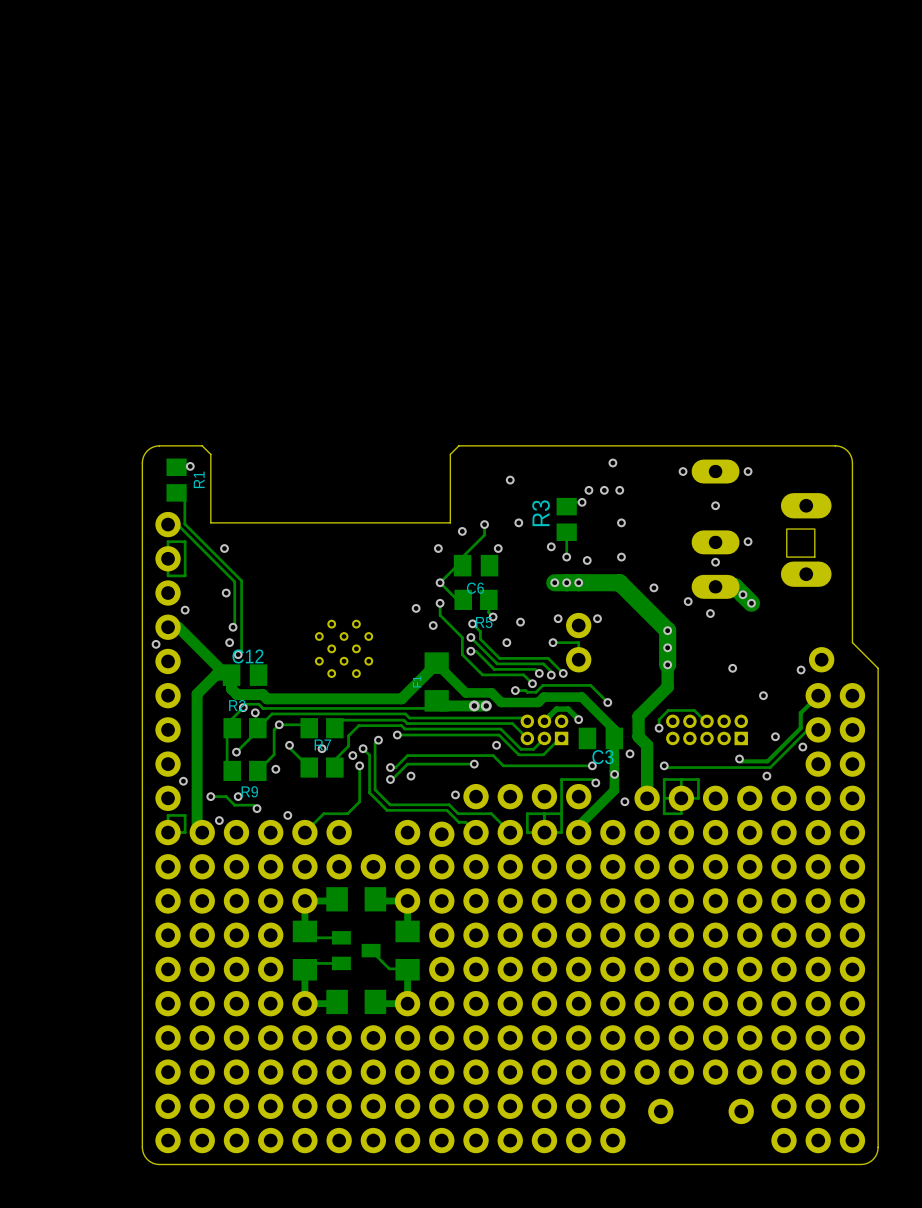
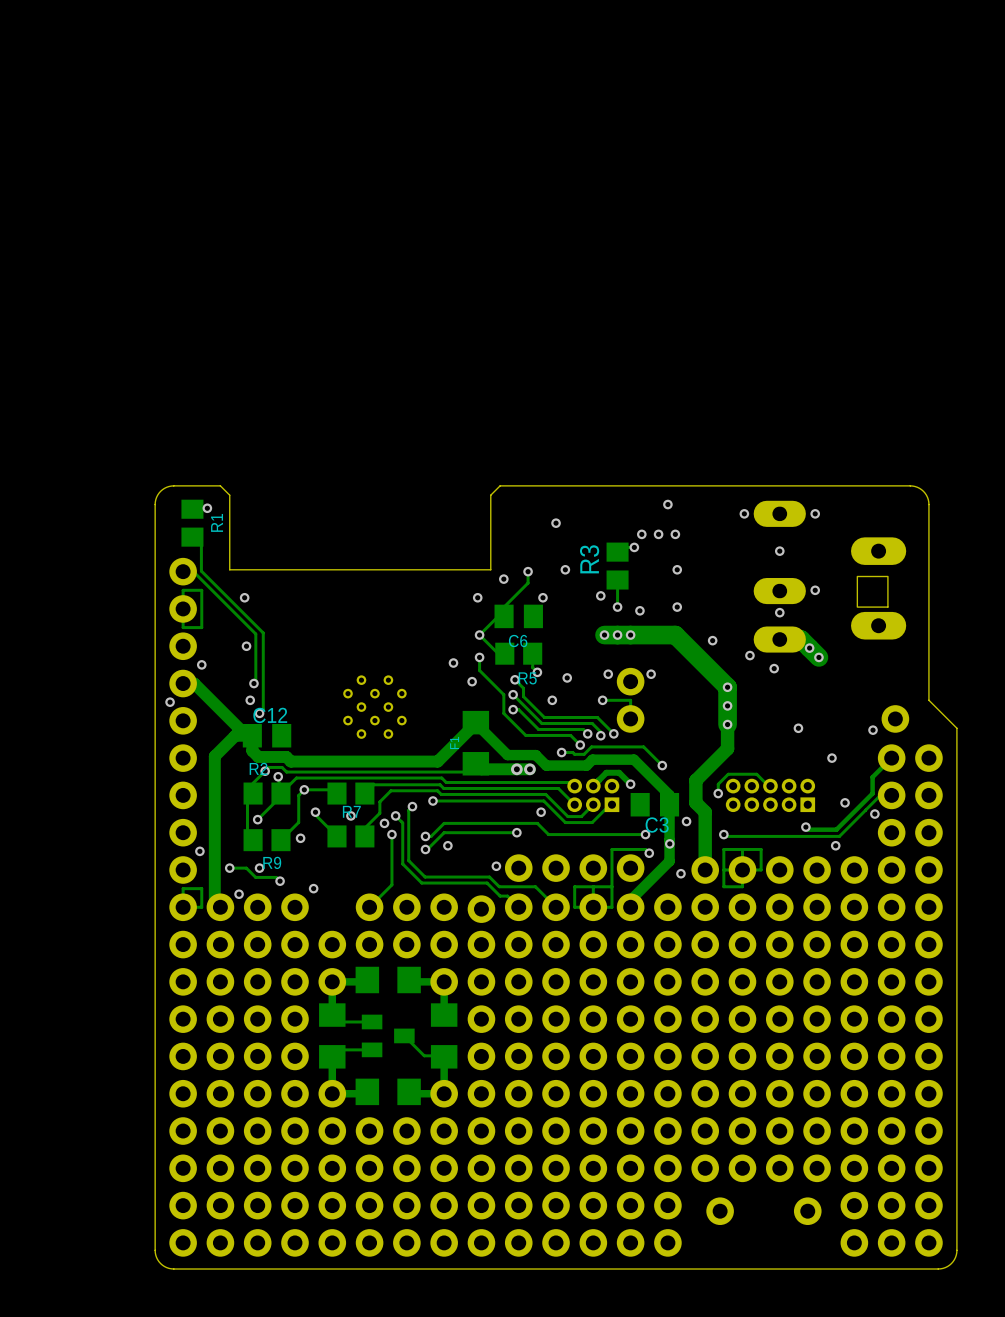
track: (359, 801) (347, 813) (323, 813) (304, 832) -> (391, 873) (391, 884) (369, 907)
part position: (304, 832) -> (406, 907)

